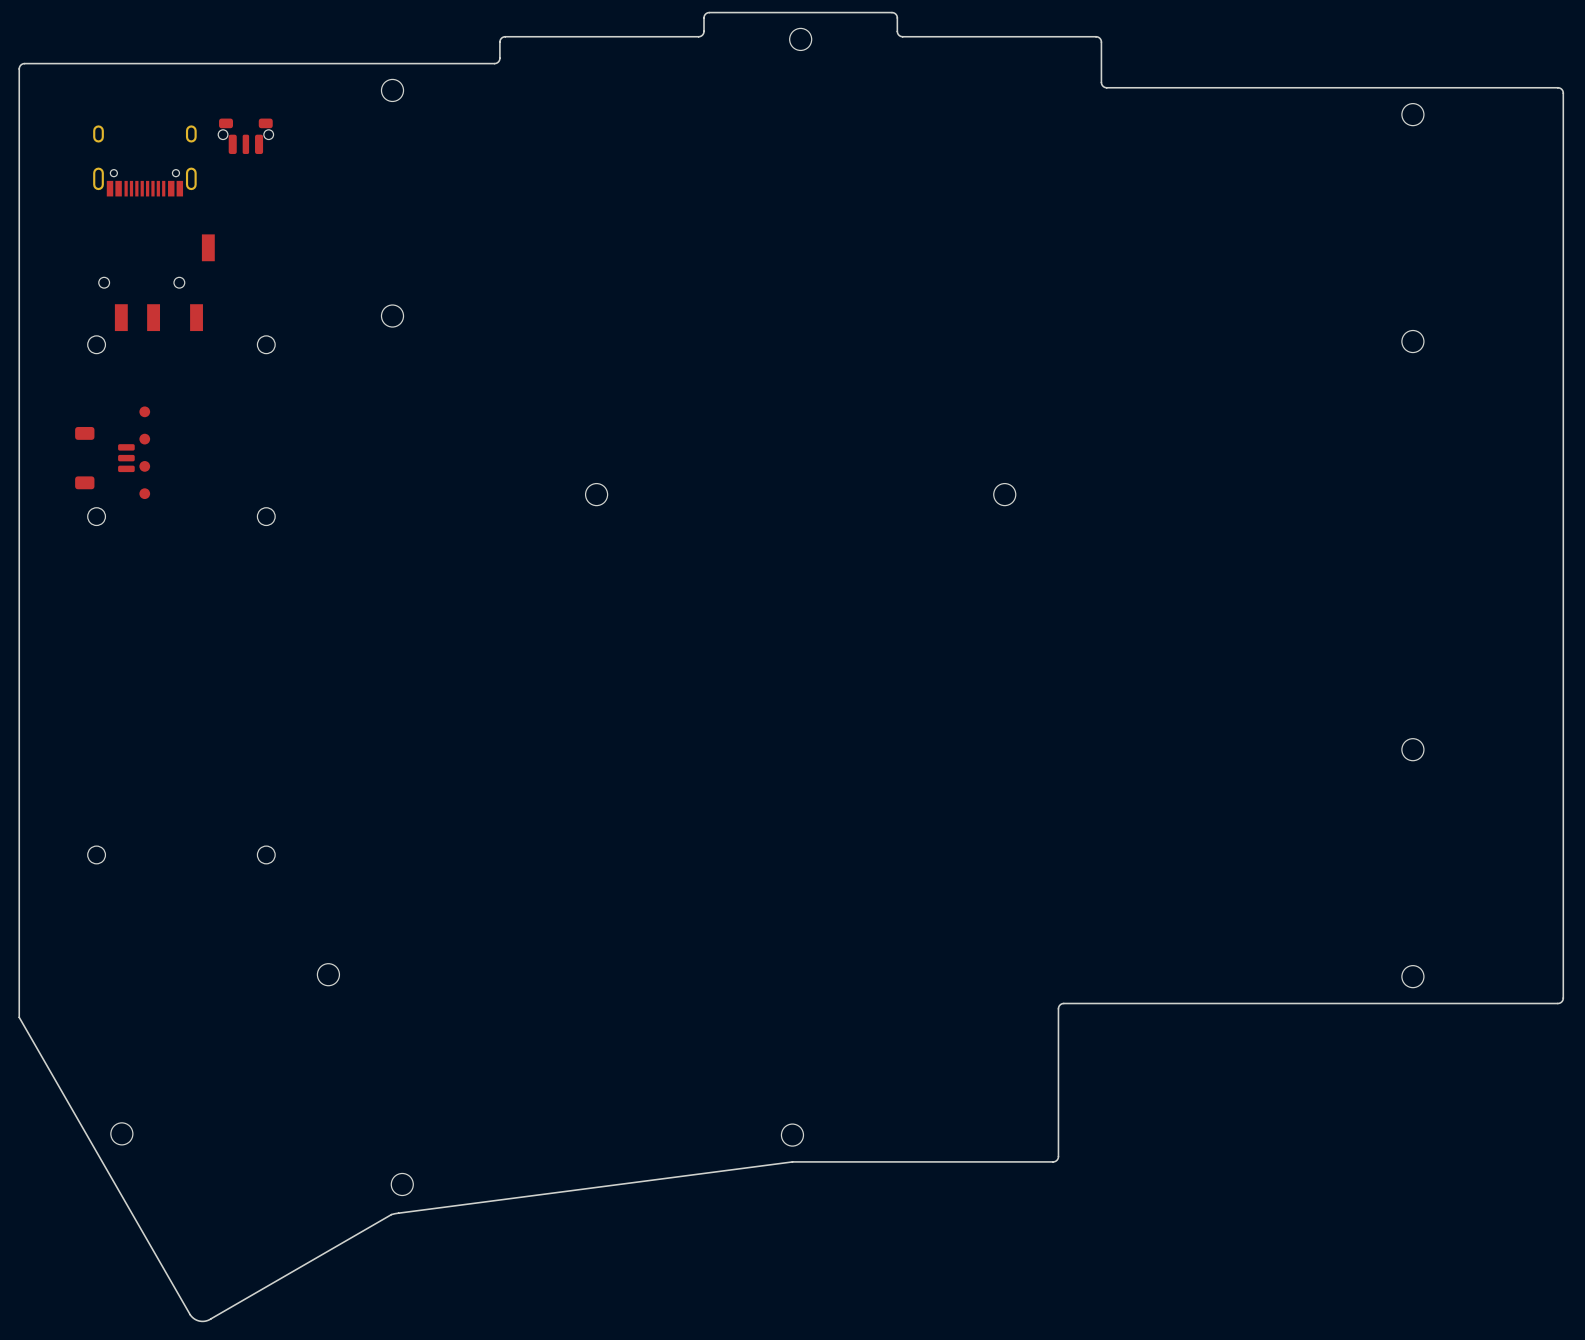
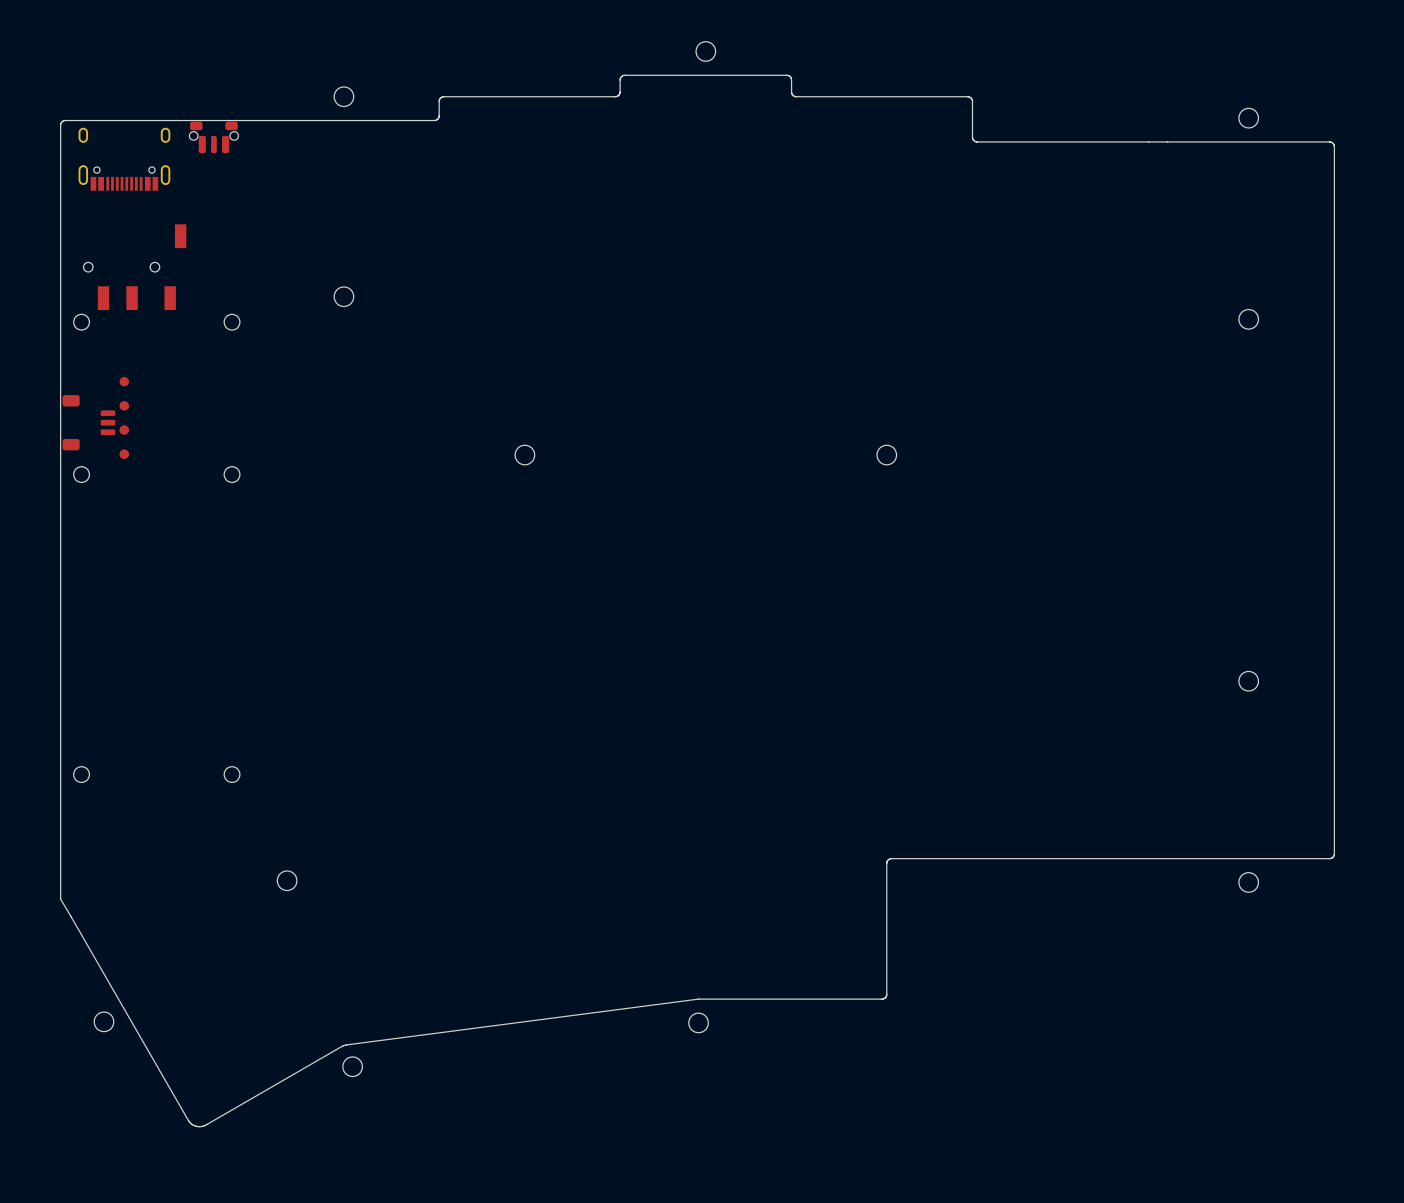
board edge: (891, 12) (708, 12) (704, 16) (703, 33) (699, 36) (504, 36) (500, 40) (499, 60) (495, 63) (24, 63) (19, 66) (19, 1017) (190, 1314) (195, 1319) (201, 1321) (209, 1319) (395, 1213) (792, 1161) (1054, 1161) (1058, 1156) (1058, 1008) (1062, 1003) (1557, 1003) (1562, 1000) (1562, 89) (1557, 87) (1106, 87) (1101, 82) (1101, 41) (1098, 37) (902, 36) (897, 32) (896, 15) (891, 12) -> (787, 75) (791, 78) (791, 93) (795, 96) (969, 97) (972, 100) (972, 137) (976, 141) (1329, 141) (1333, 143) (1333, 856) (1329, 858) (890, 858) (886, 863) (886, 994) (883, 998) (698, 999) (346, 1045) (205, 1125) (198, 1126) (192, 1124) (188, 1120) (60, 899) (61, 122) (65, 120) (434, 120) (438, 117) (439, 100) (443, 96) (615, 96) (619, 93) (620, 78) (624, 75) (787, 75)

